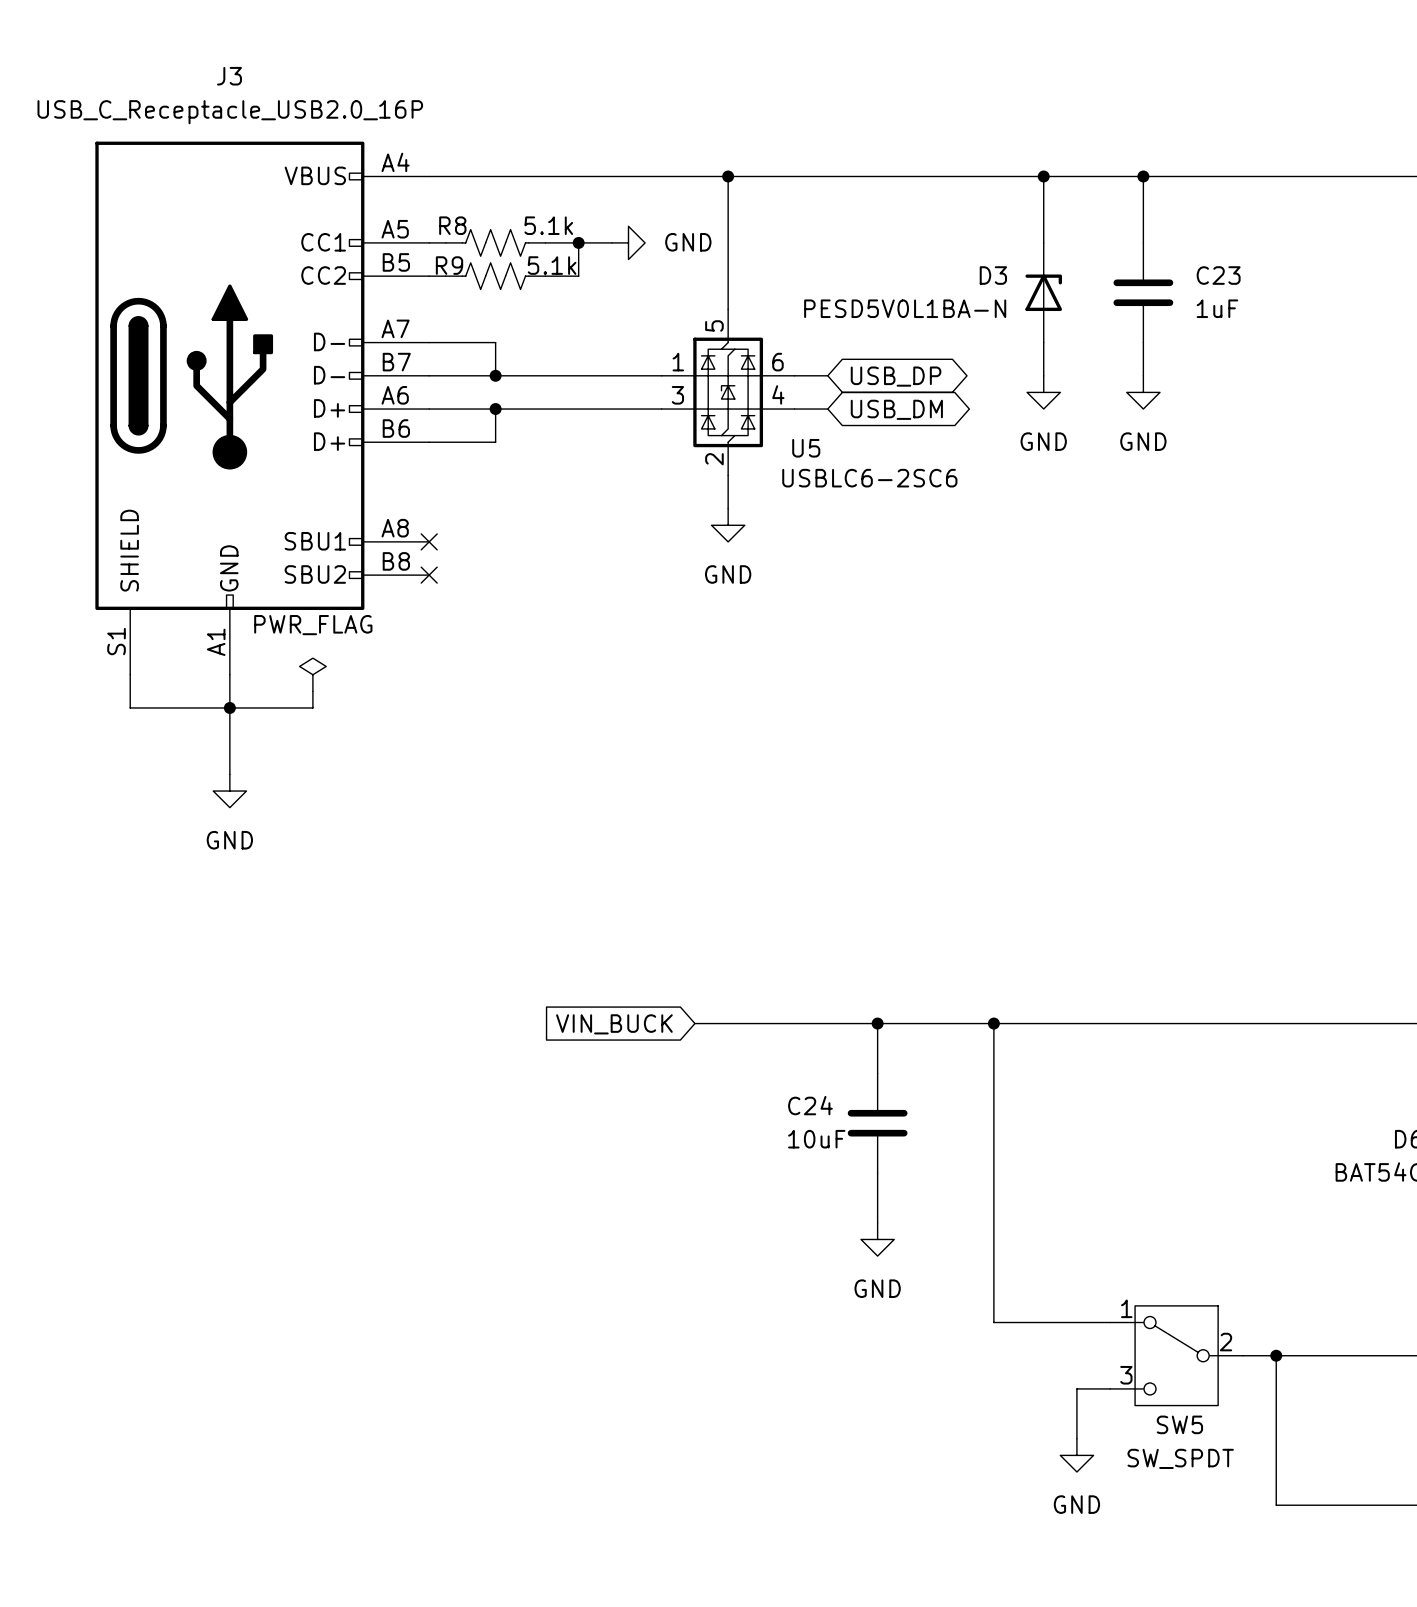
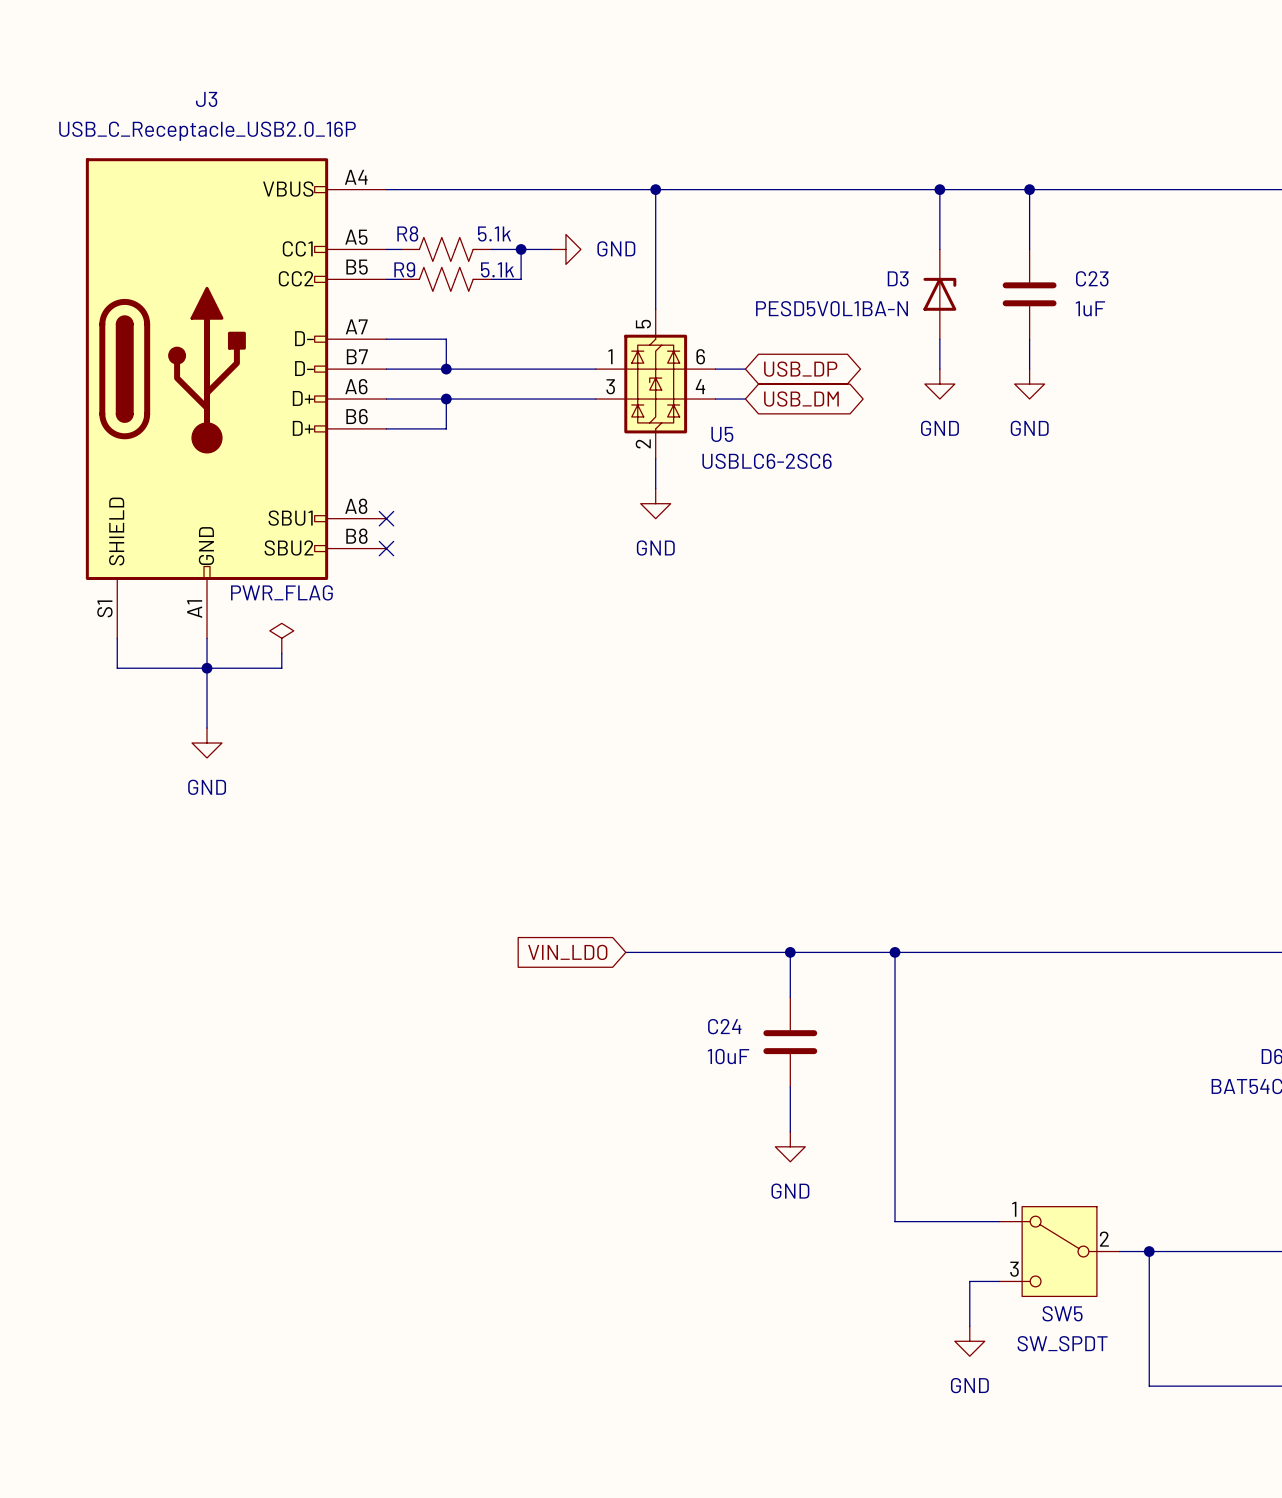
global label: VIN_BUCK (614, 1024) -> VIN_LDO (567, 952)

